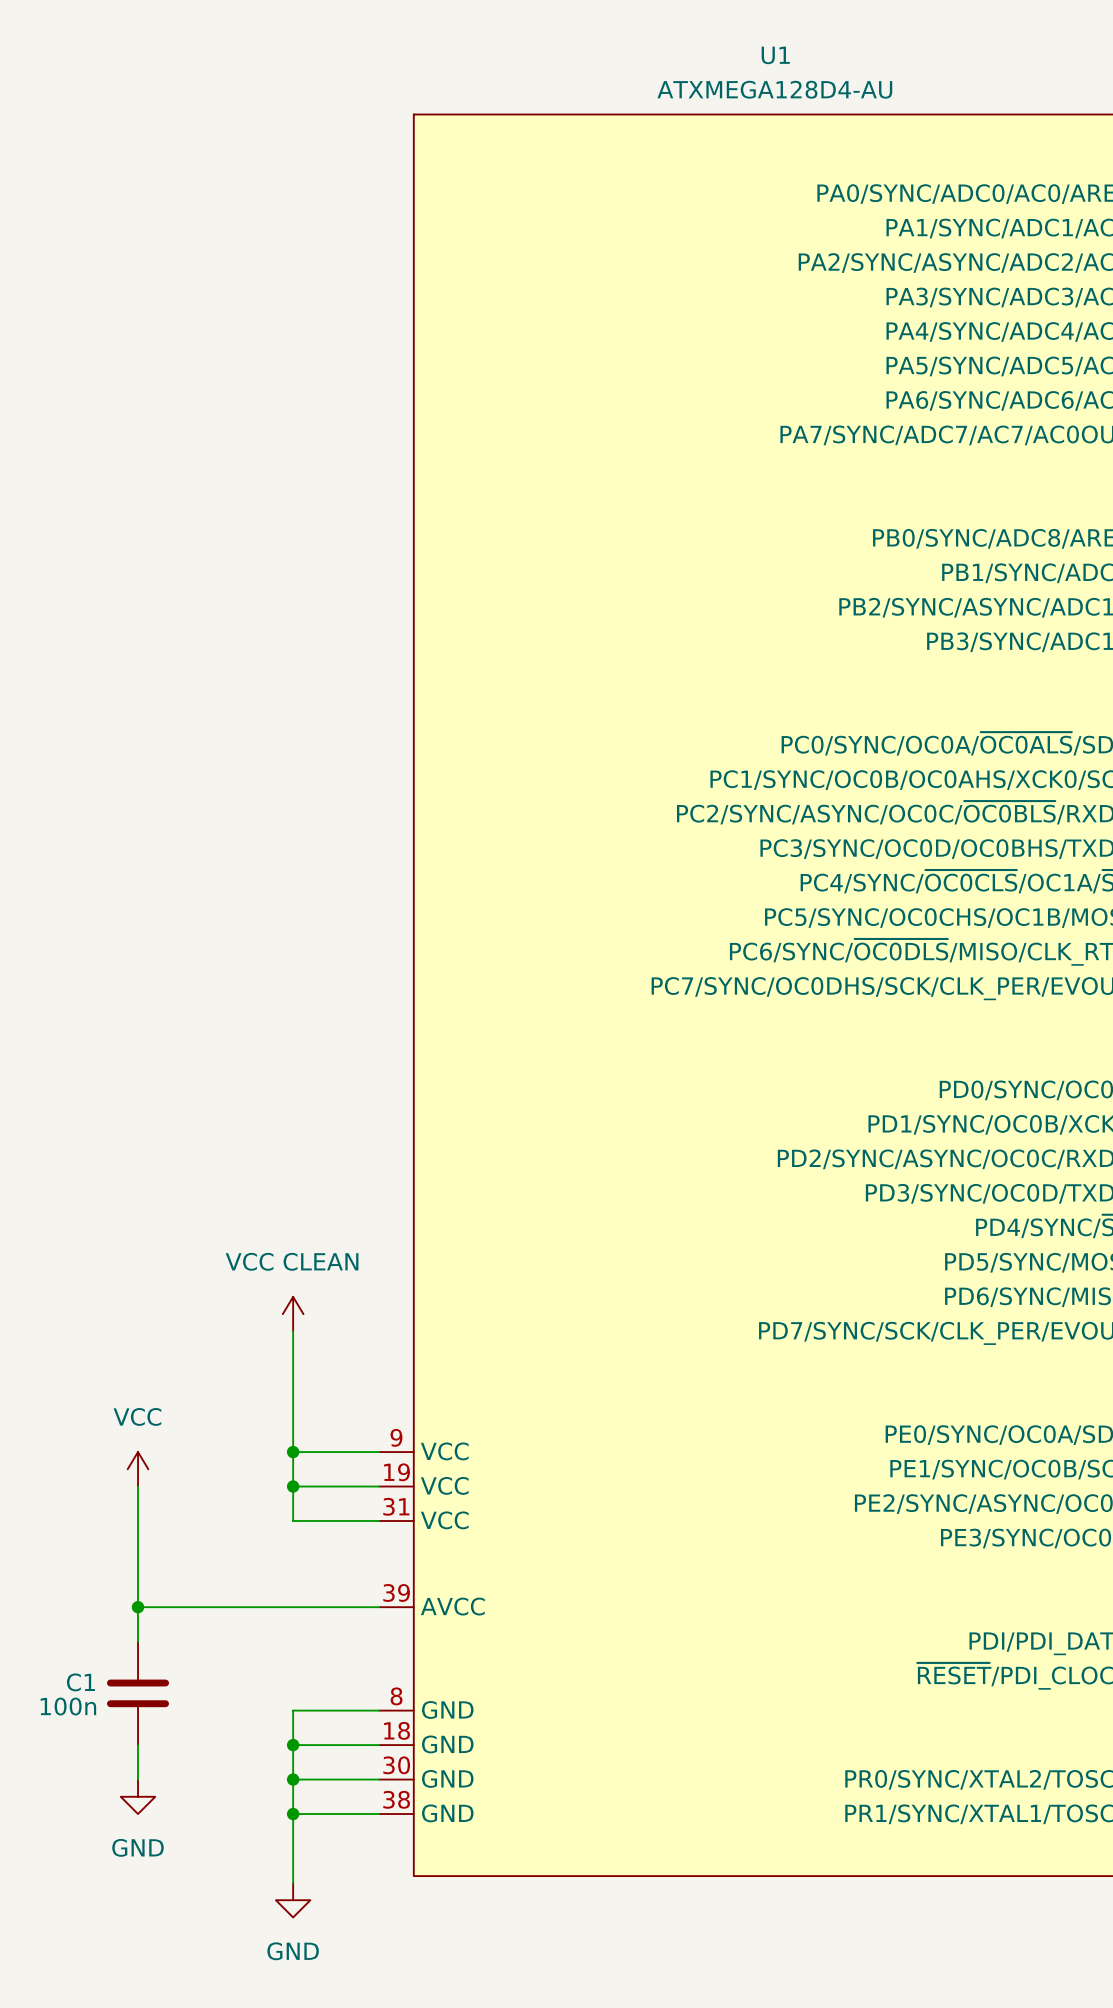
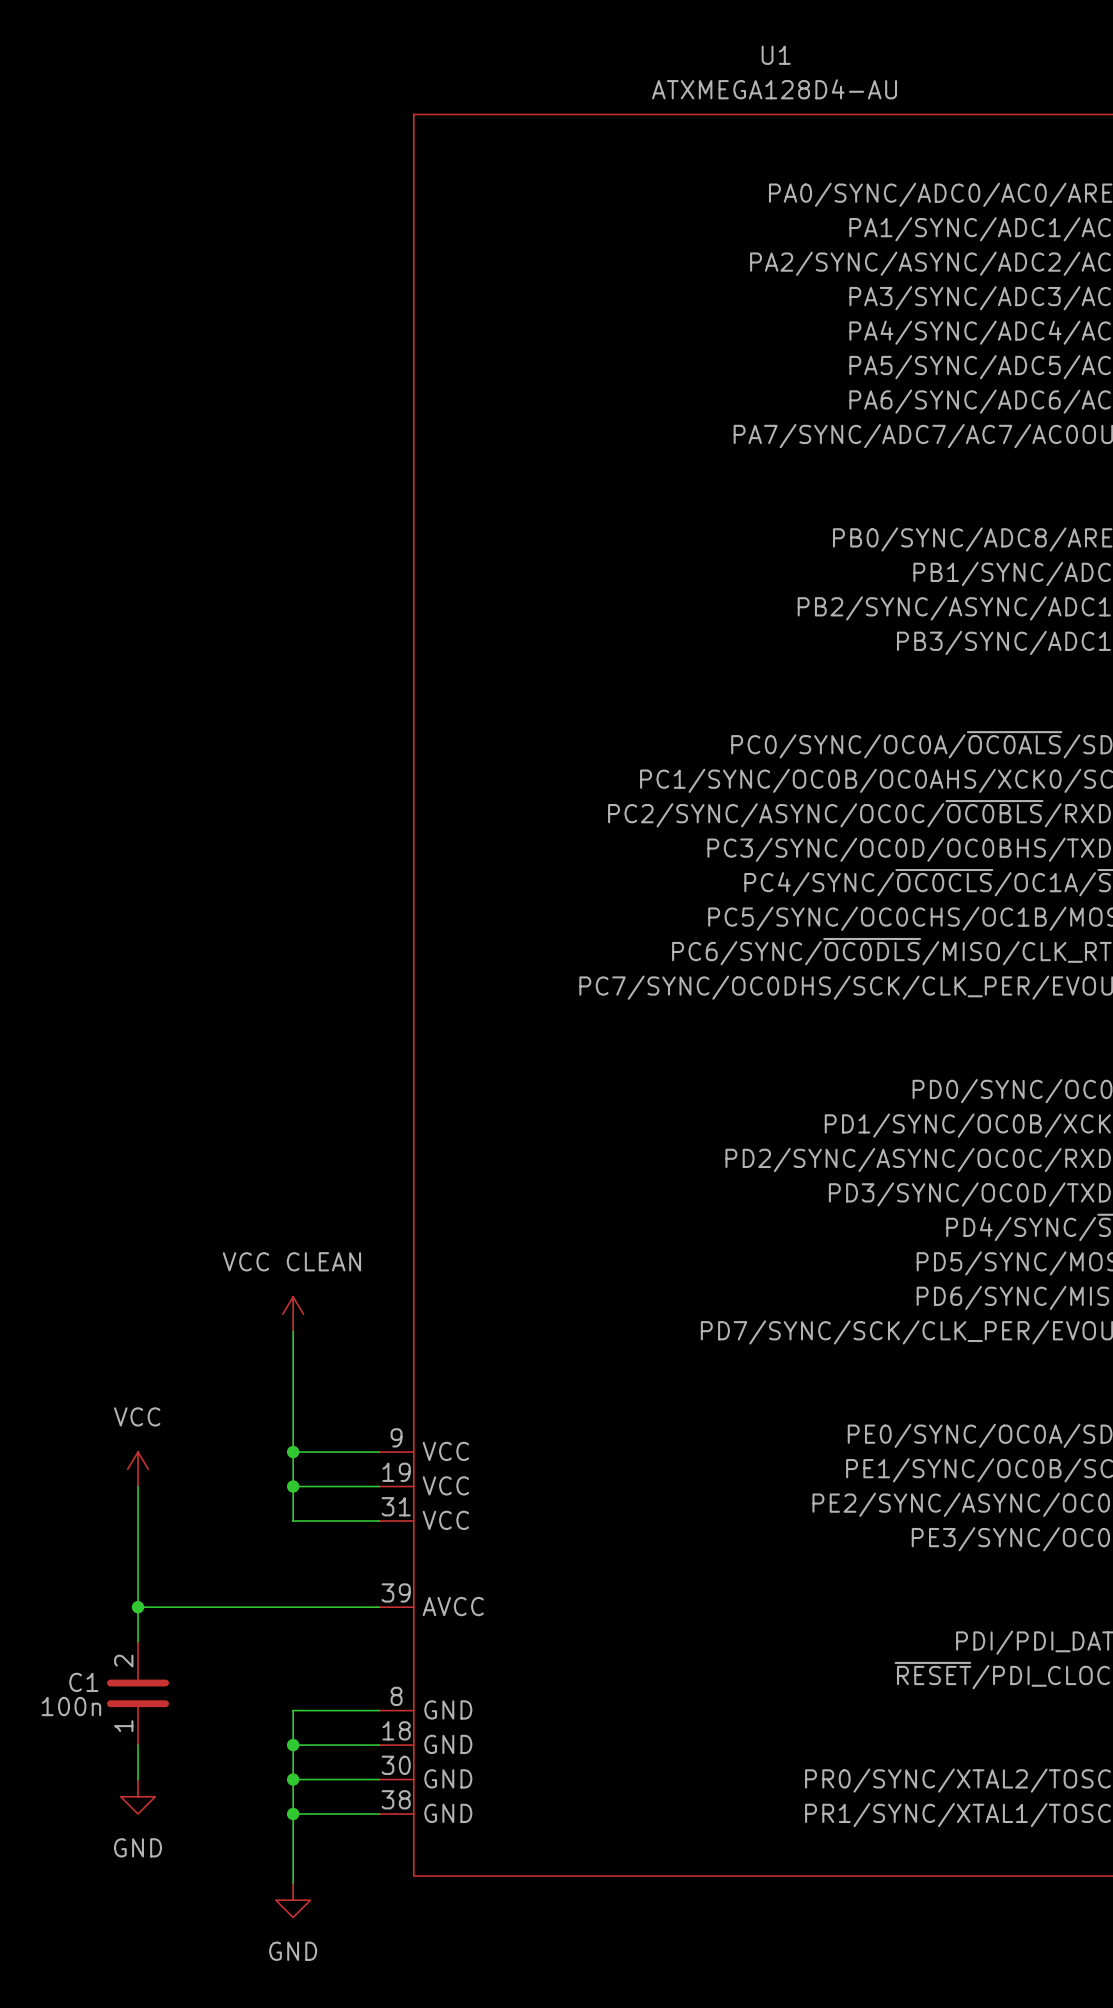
C1 pin number: none -> 2 (123, 1661)
C1 pin number: none -> 1 (123, 1726)

